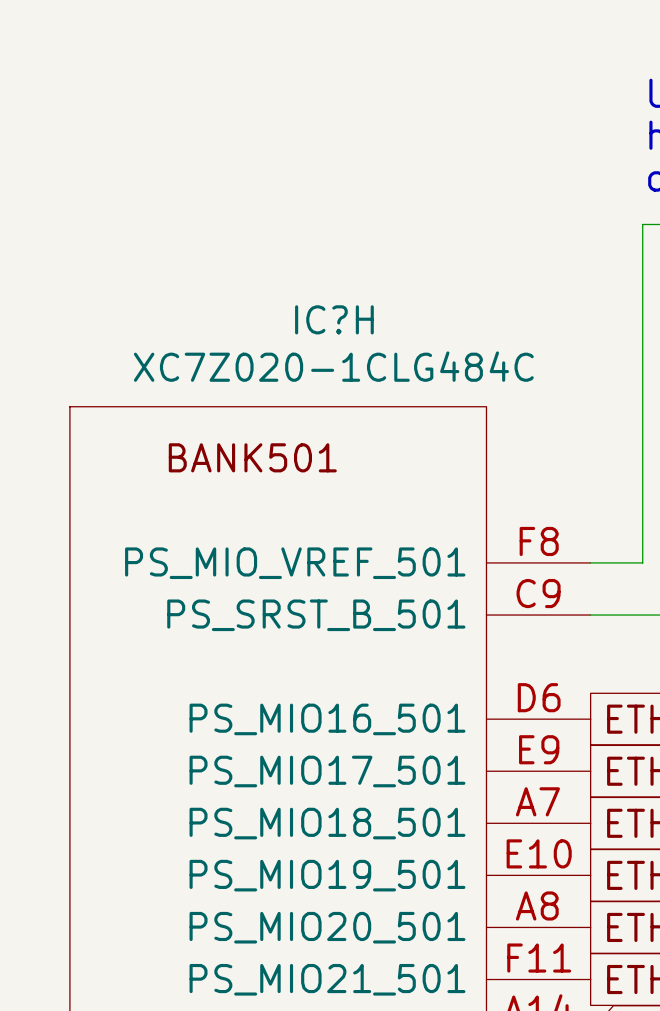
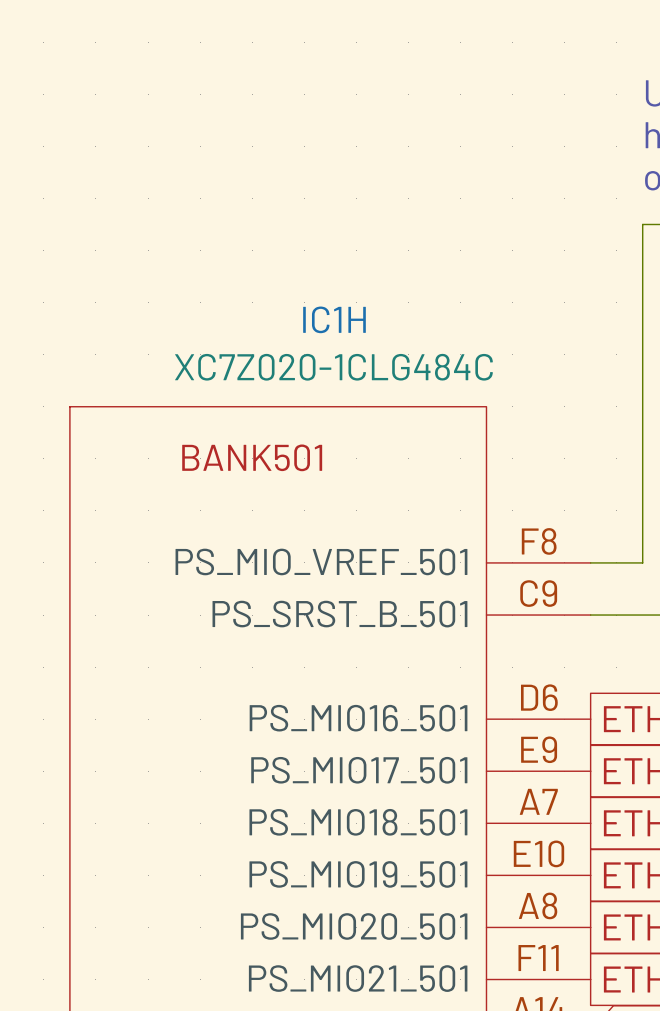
IC?H name: IC?H (334, 319) -> IC1H (334, 319)

